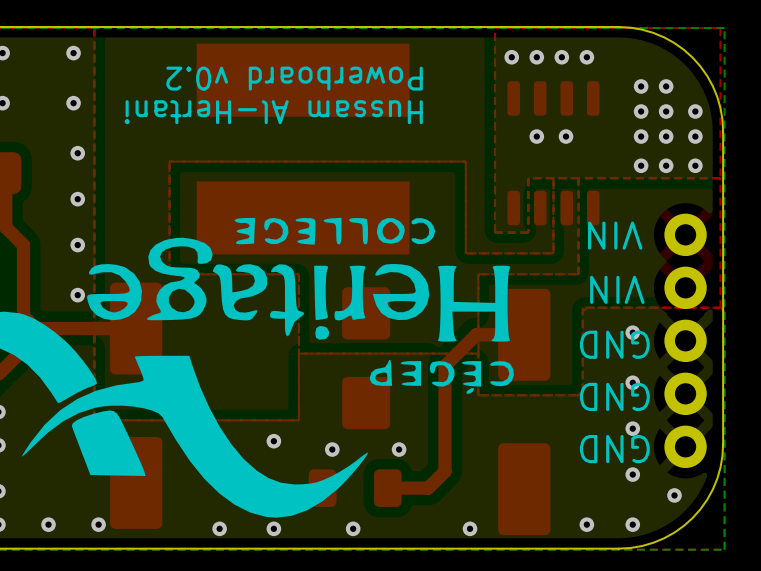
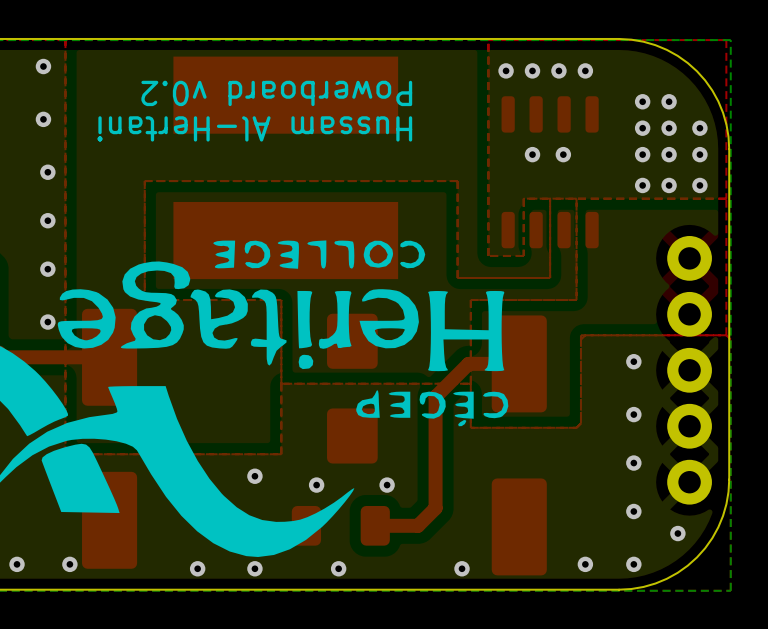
text: VIN (615, 235) -> none
text: VIN (617, 289) -> none
text: GND (614, 344) -> none
text: GND (614, 396) -> none
text: GND (614, 449) -> none

